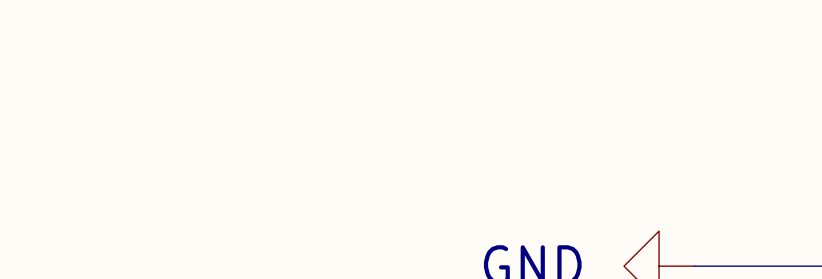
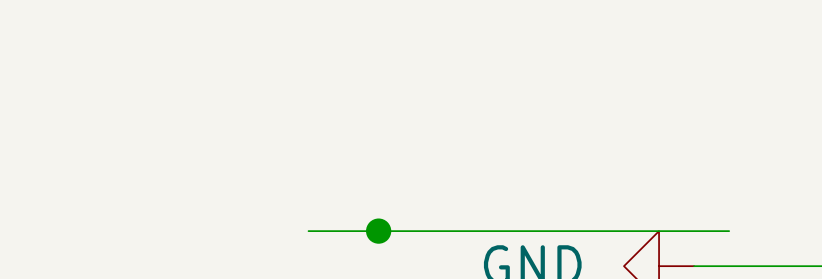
wire: none -> (308, 231) (729, 231)
junction: none -> (378, 231)

